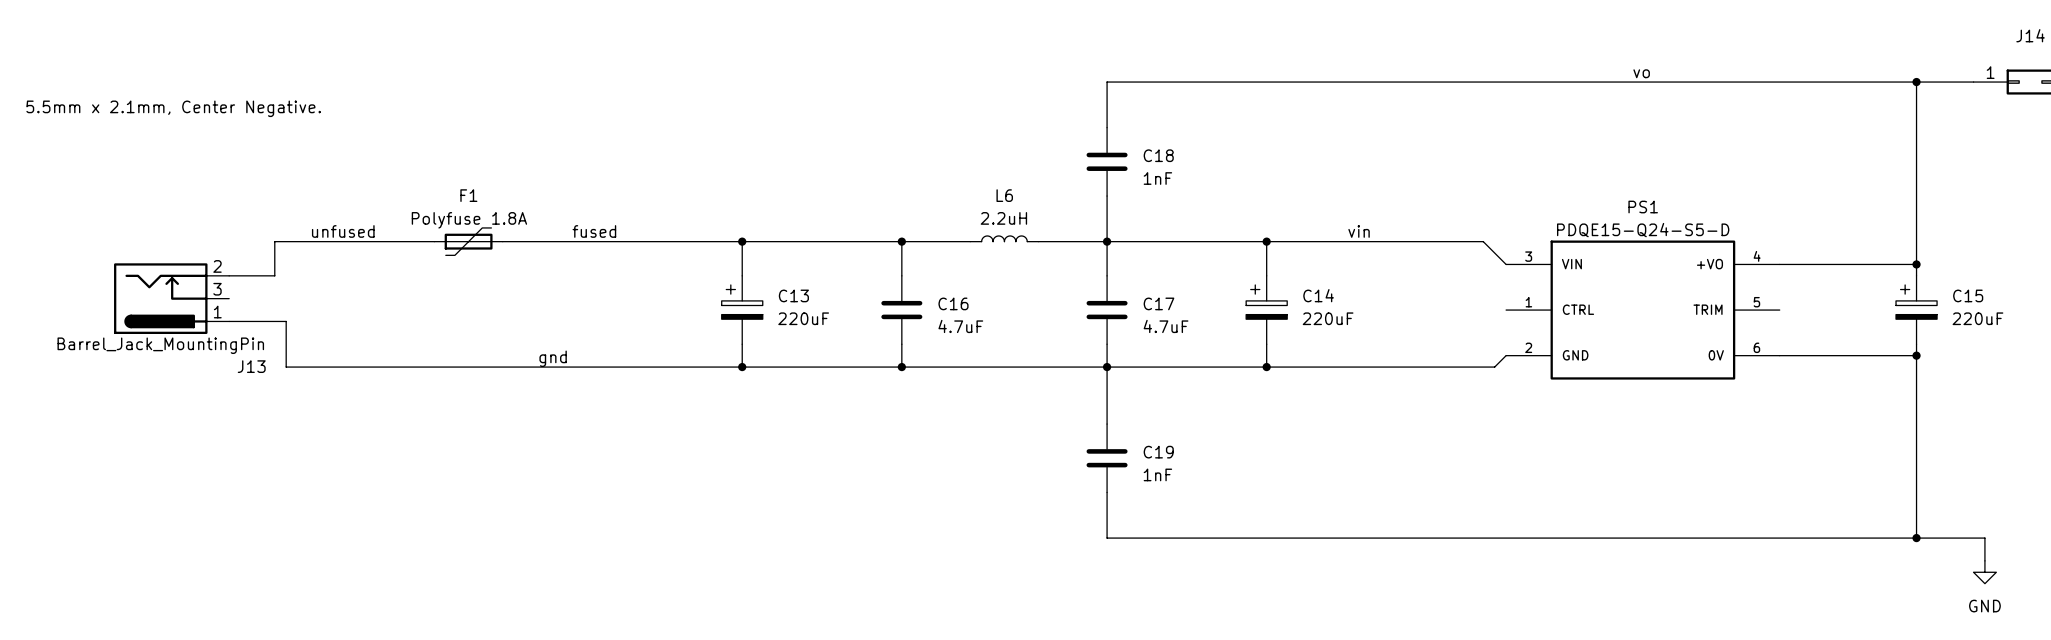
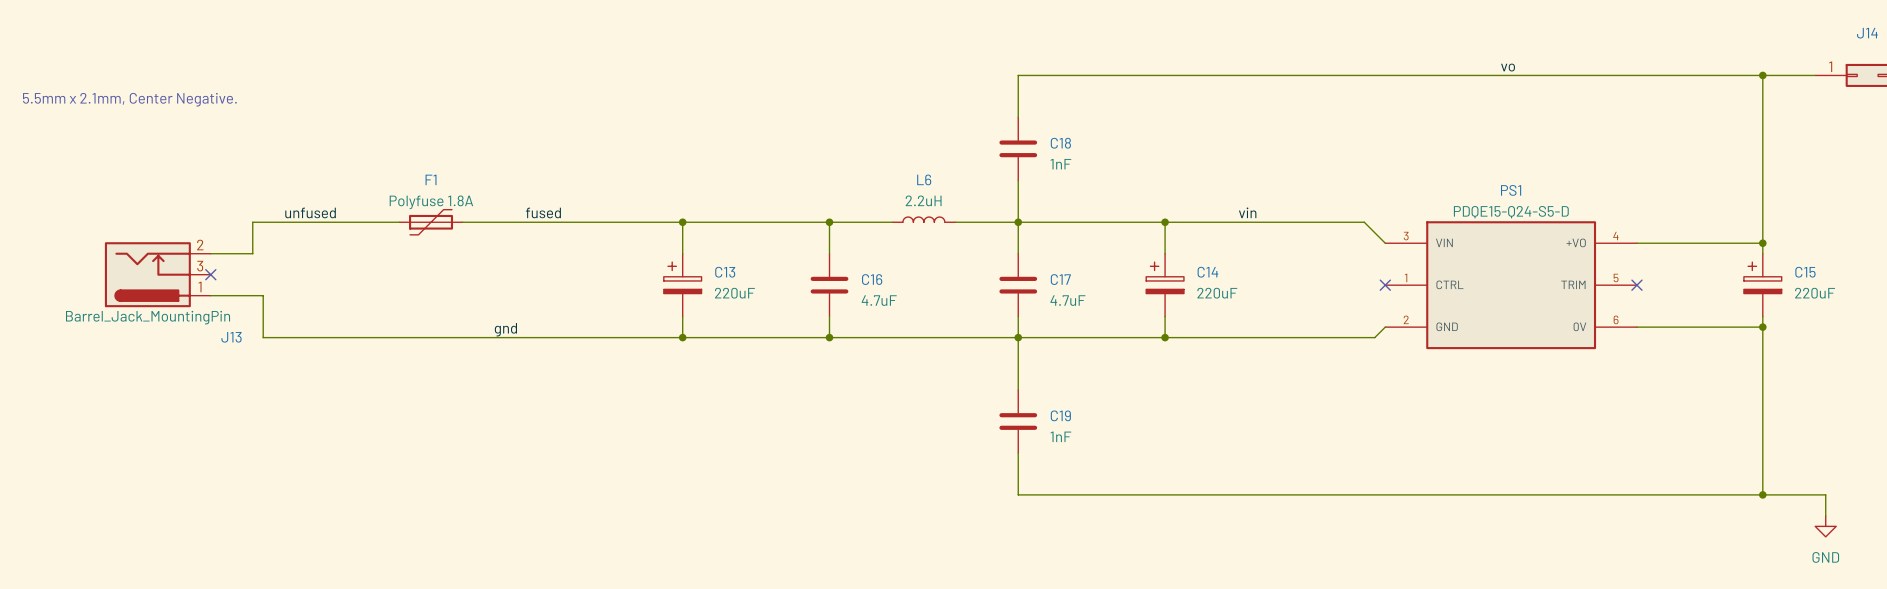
no-connect mark: none -> (210, 274)
no-connect mark: none -> (1385, 285)
no-connect mark: none -> (1636, 285)

